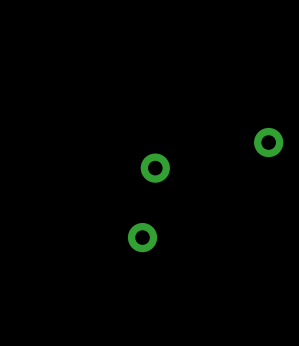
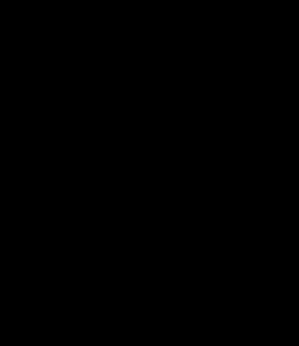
via: (268, 142) -> none
via: (155, 168) -> none
via: (142, 237) -> none

